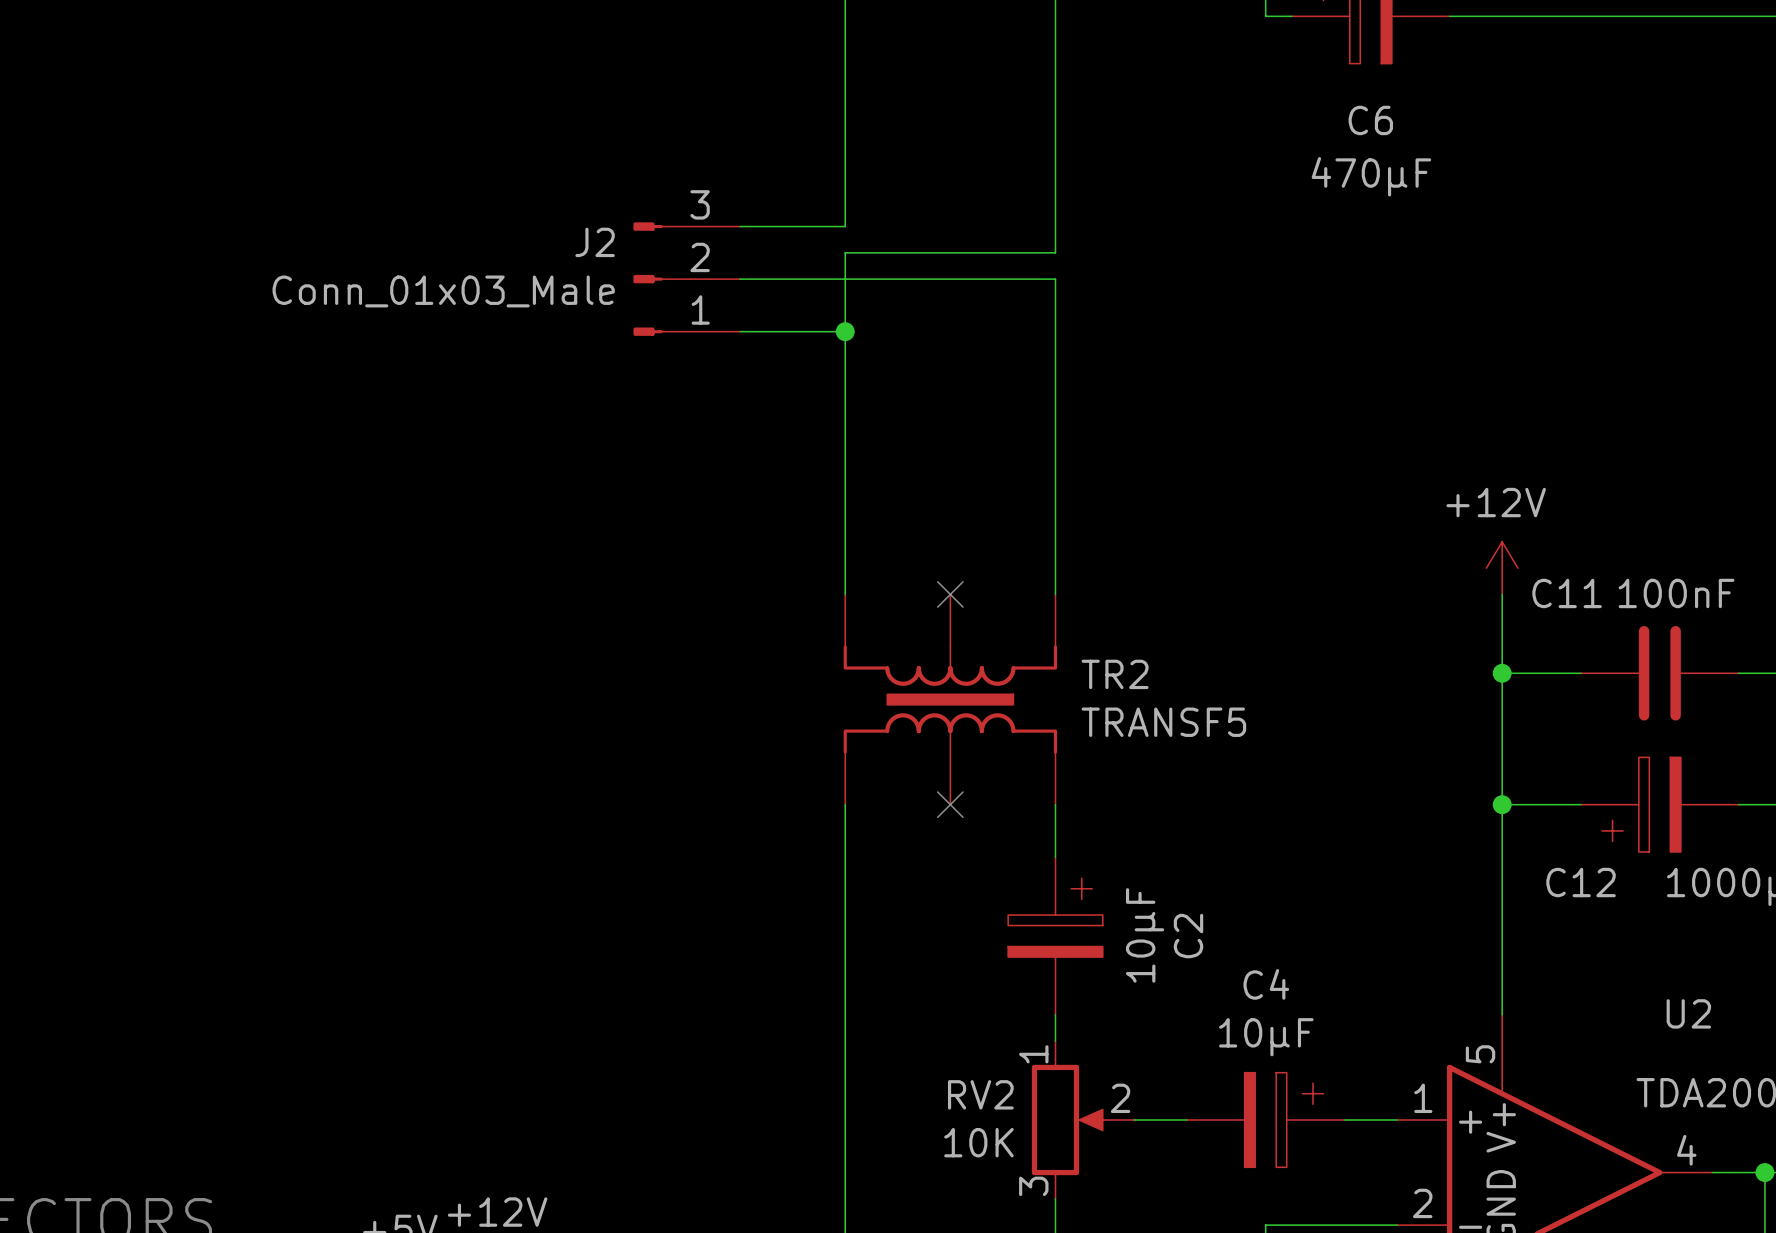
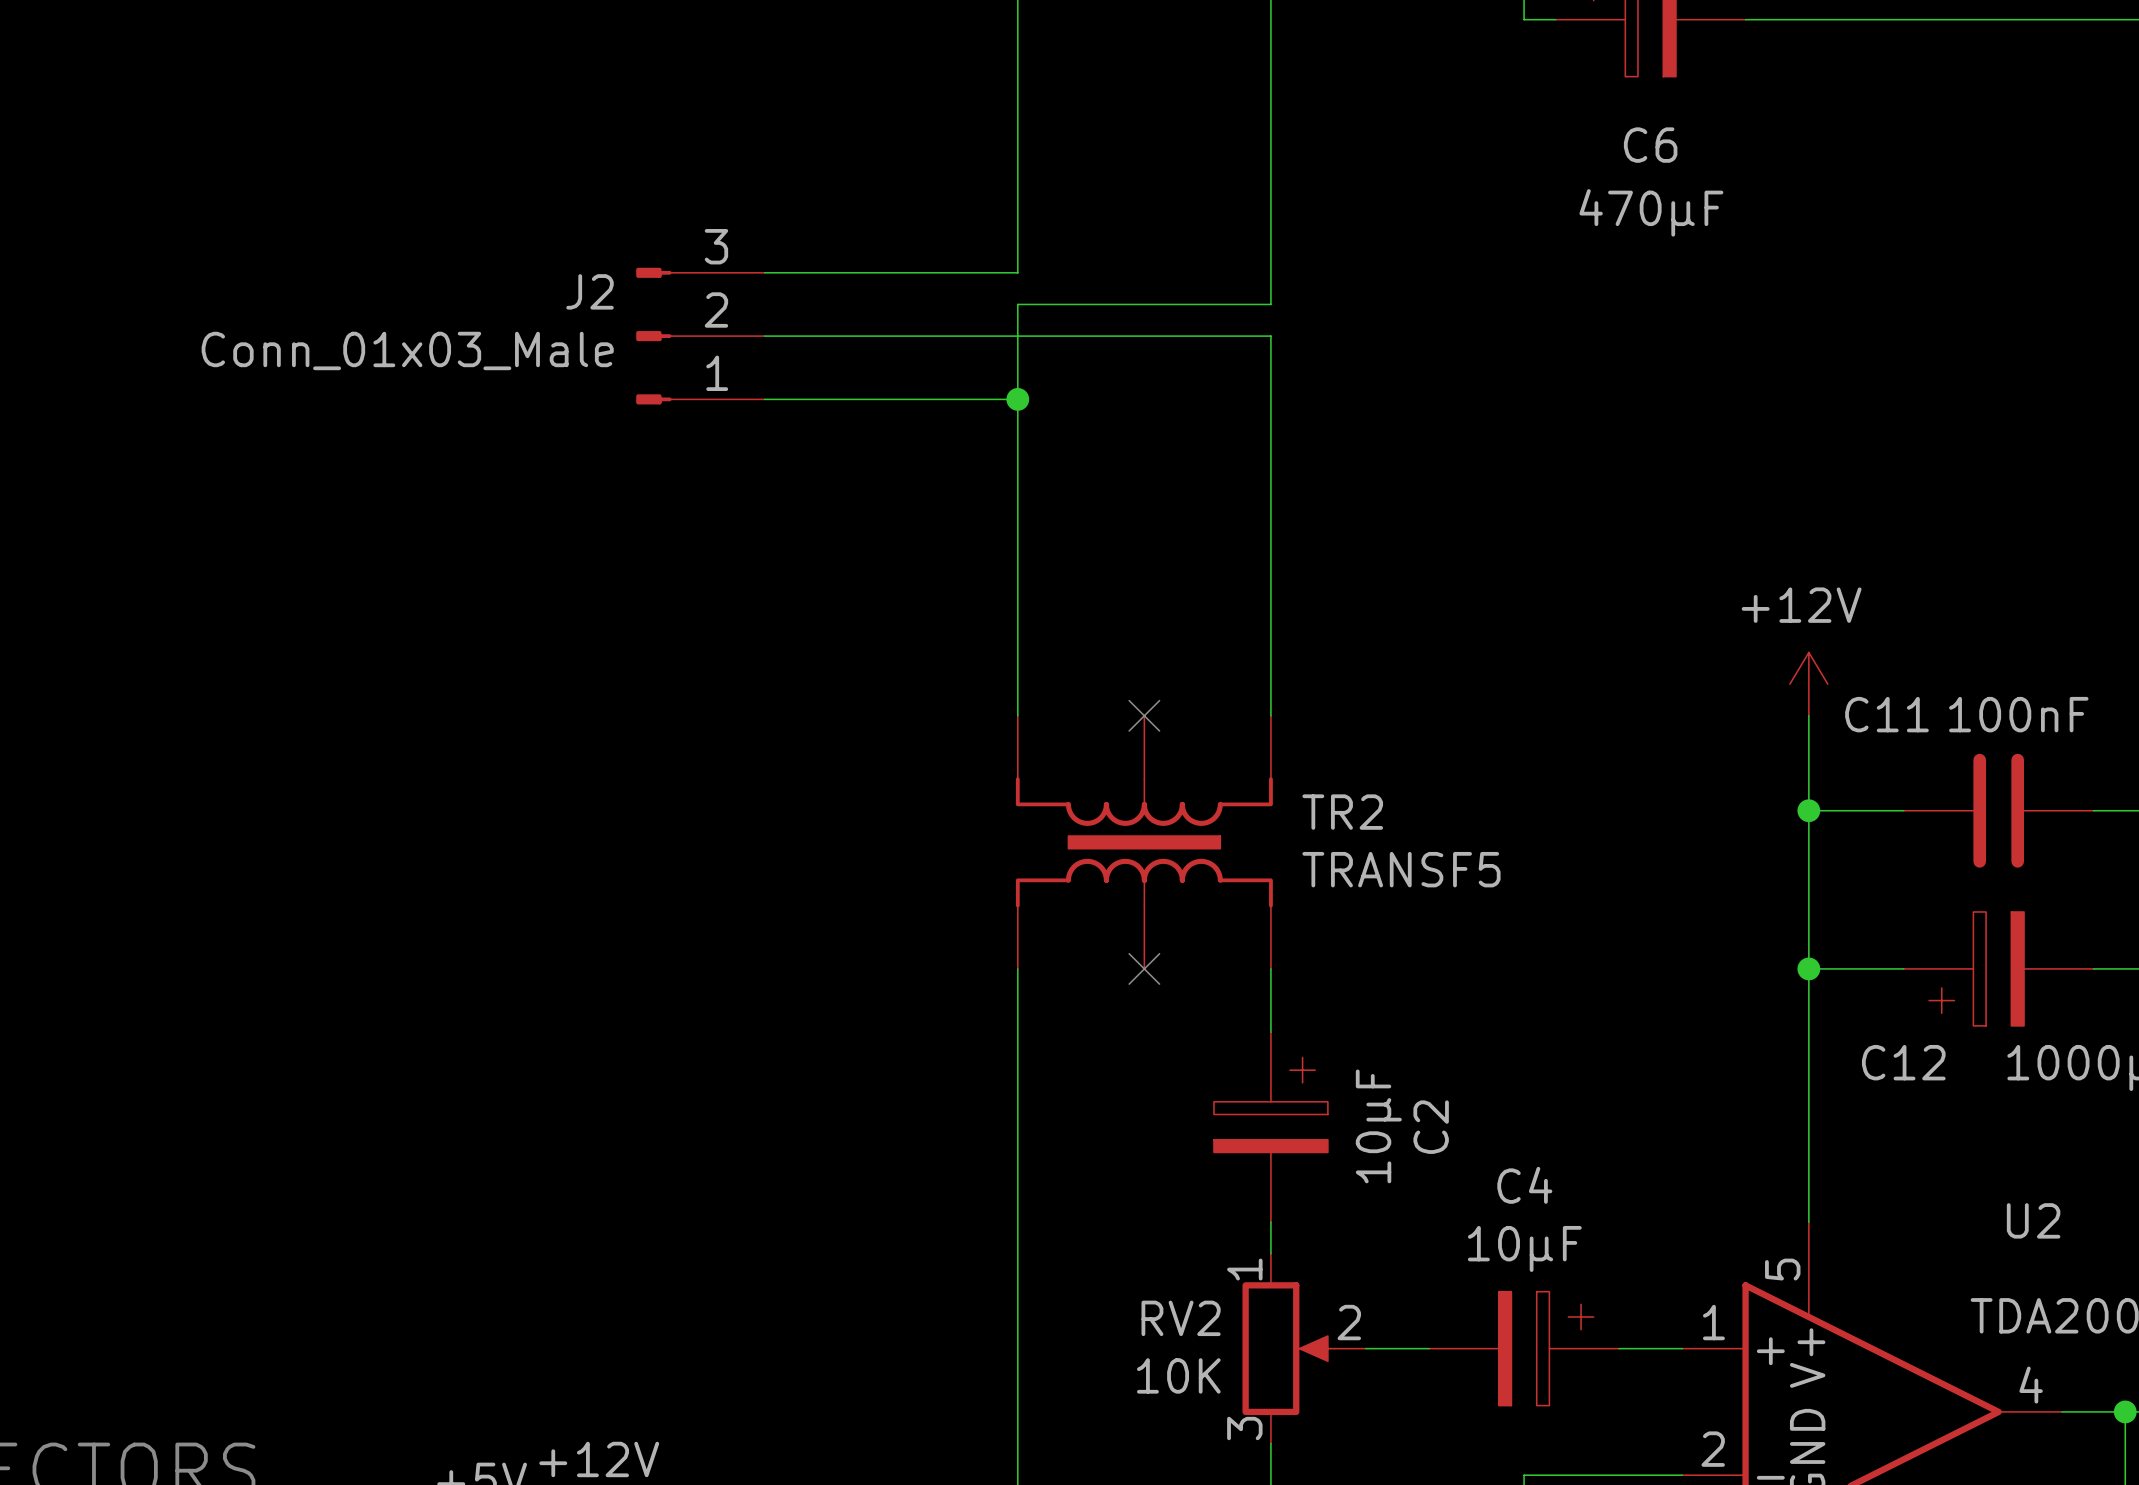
J2 position: (686, 279) -> (700, 336)

